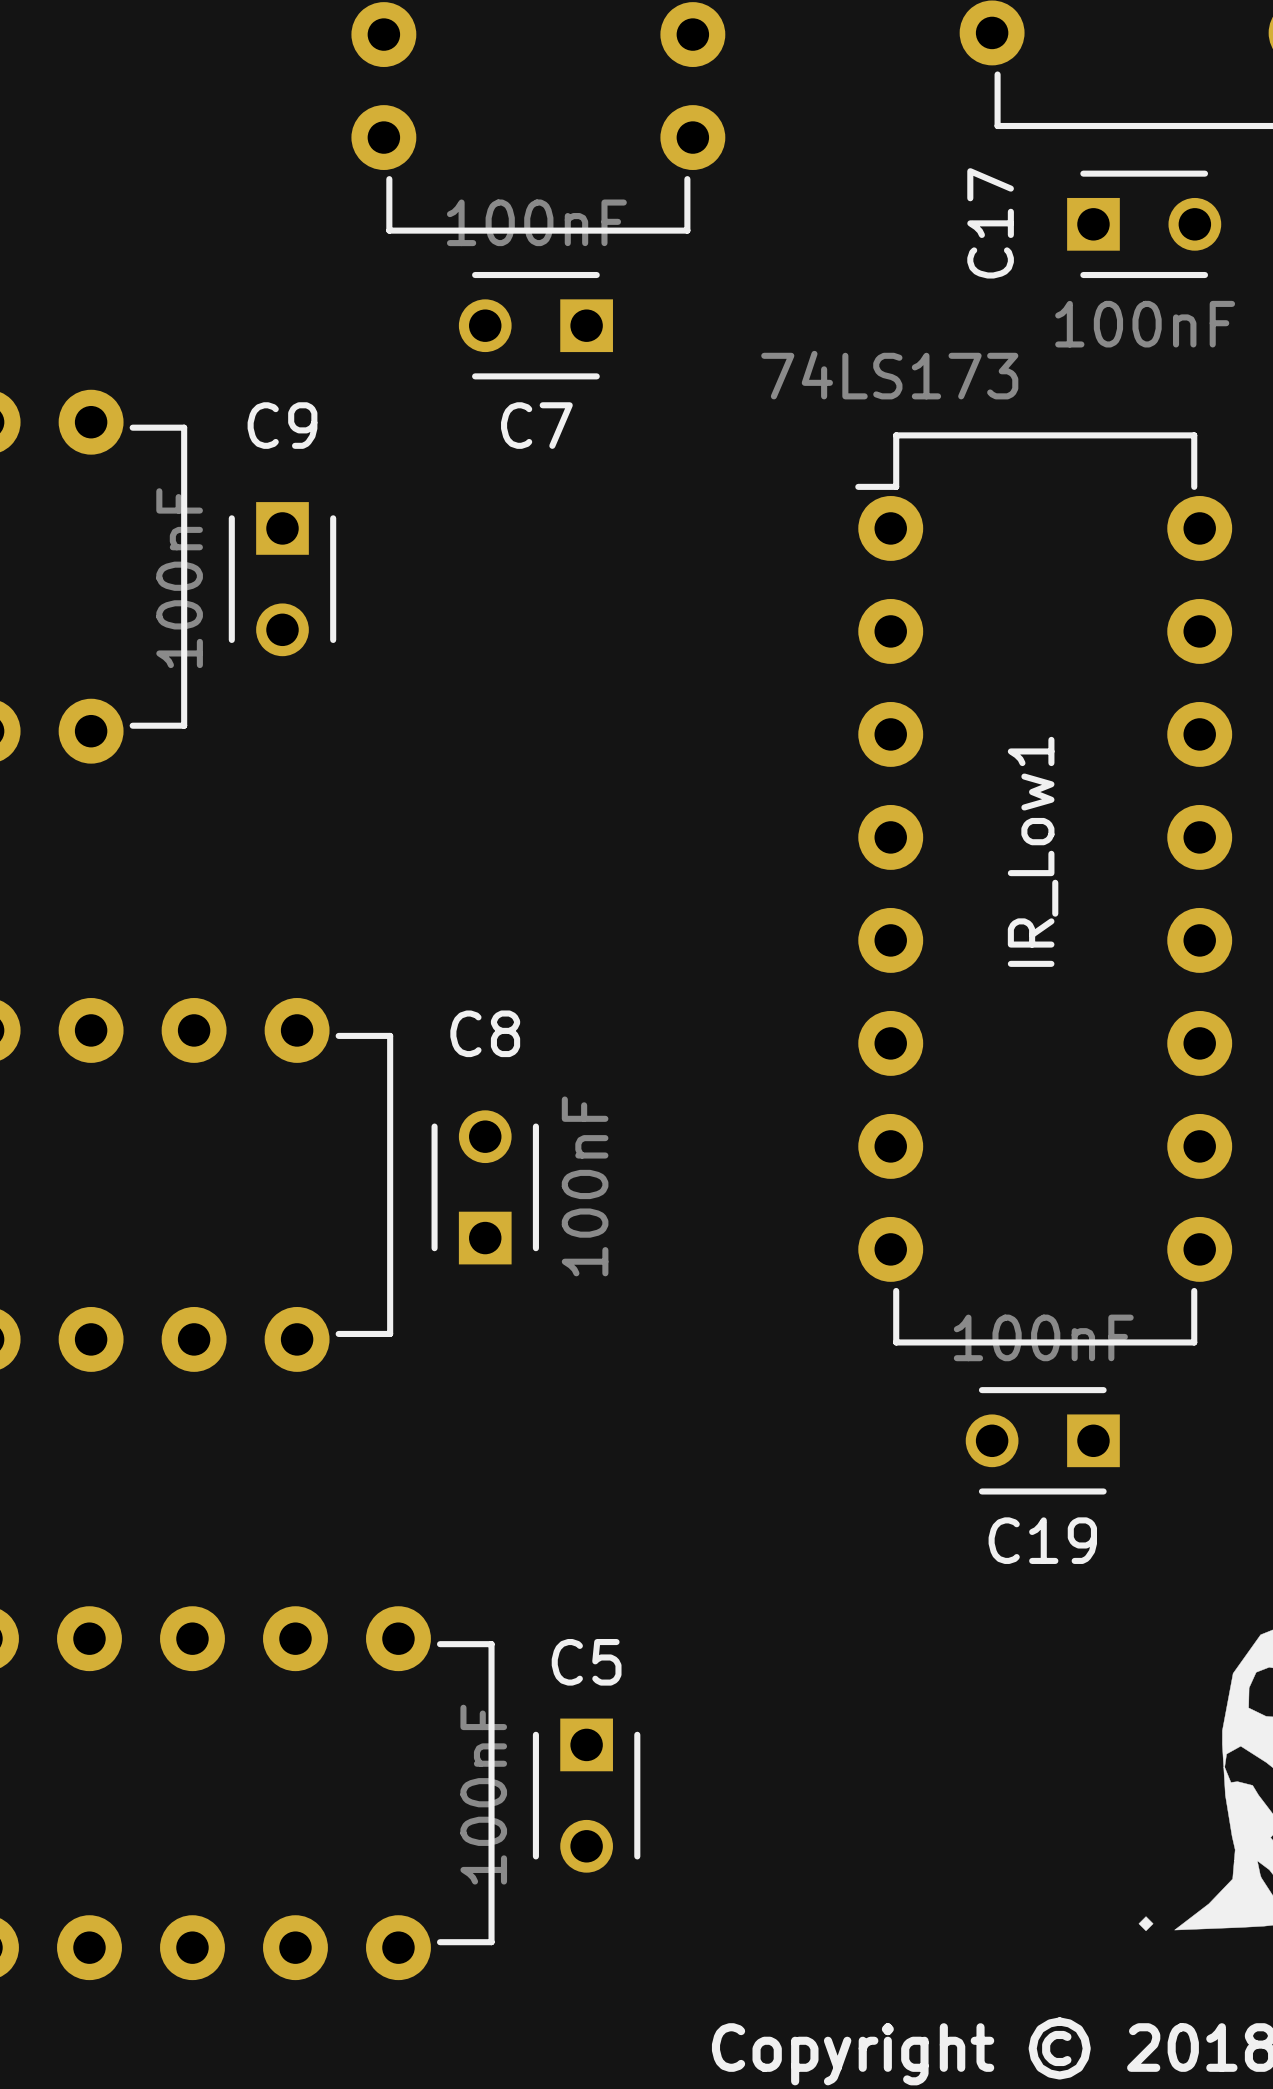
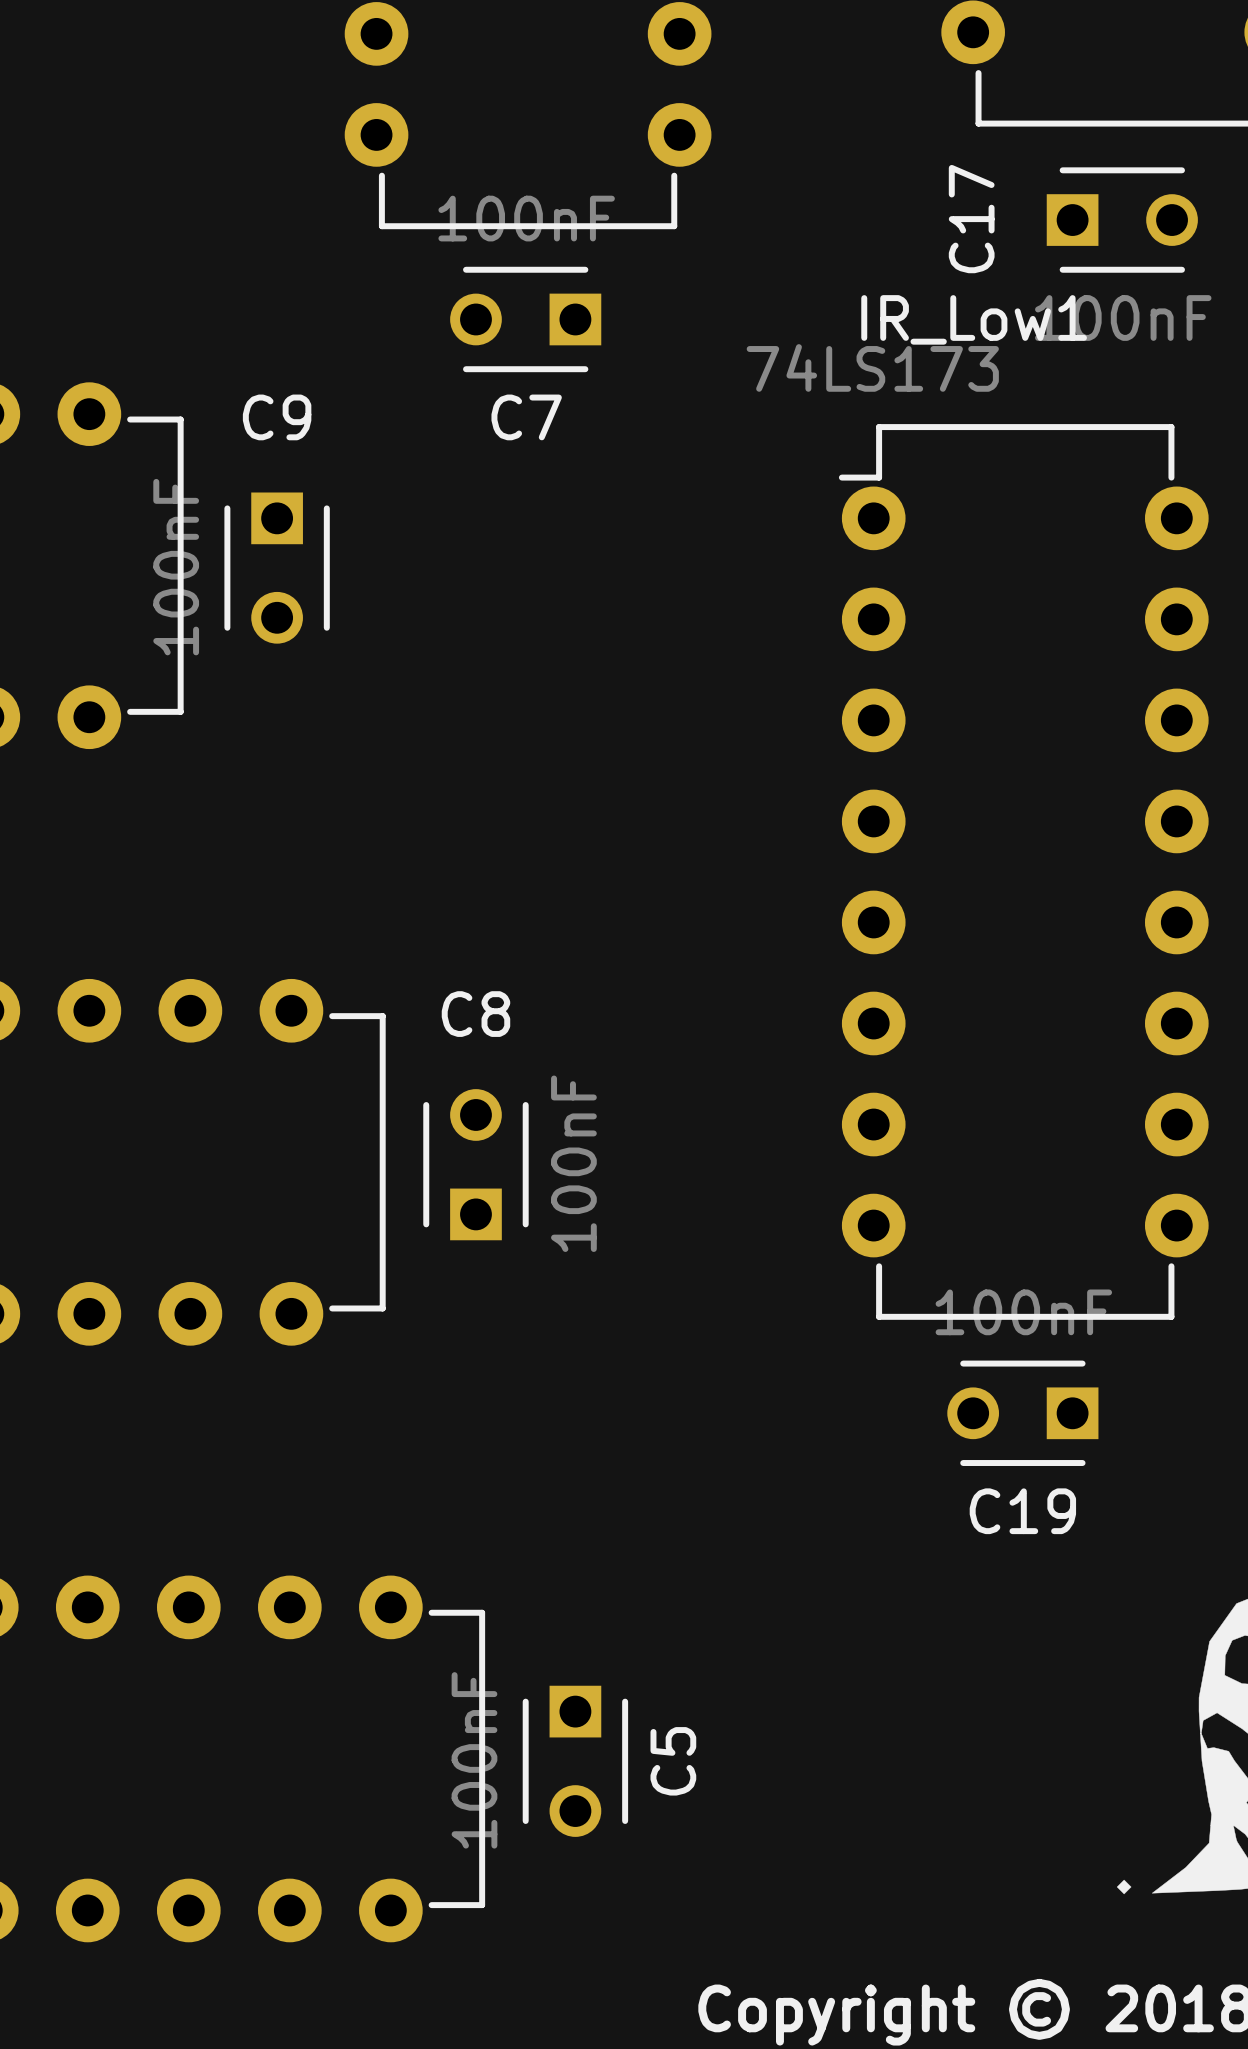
IR_Low1 name rotation: 0° (1033, 851) -> 90° clockwise (974, 319)
IR_Low1 name position: IR_Low1 (1033, 851) -> IR_Low1 (974, 319)
C5 name rotation: 0° (586, 1662) -> 90° counterclockwise (673, 1761)
C5 name position: C5 (586, 1662) -> C5 (673, 1761)

